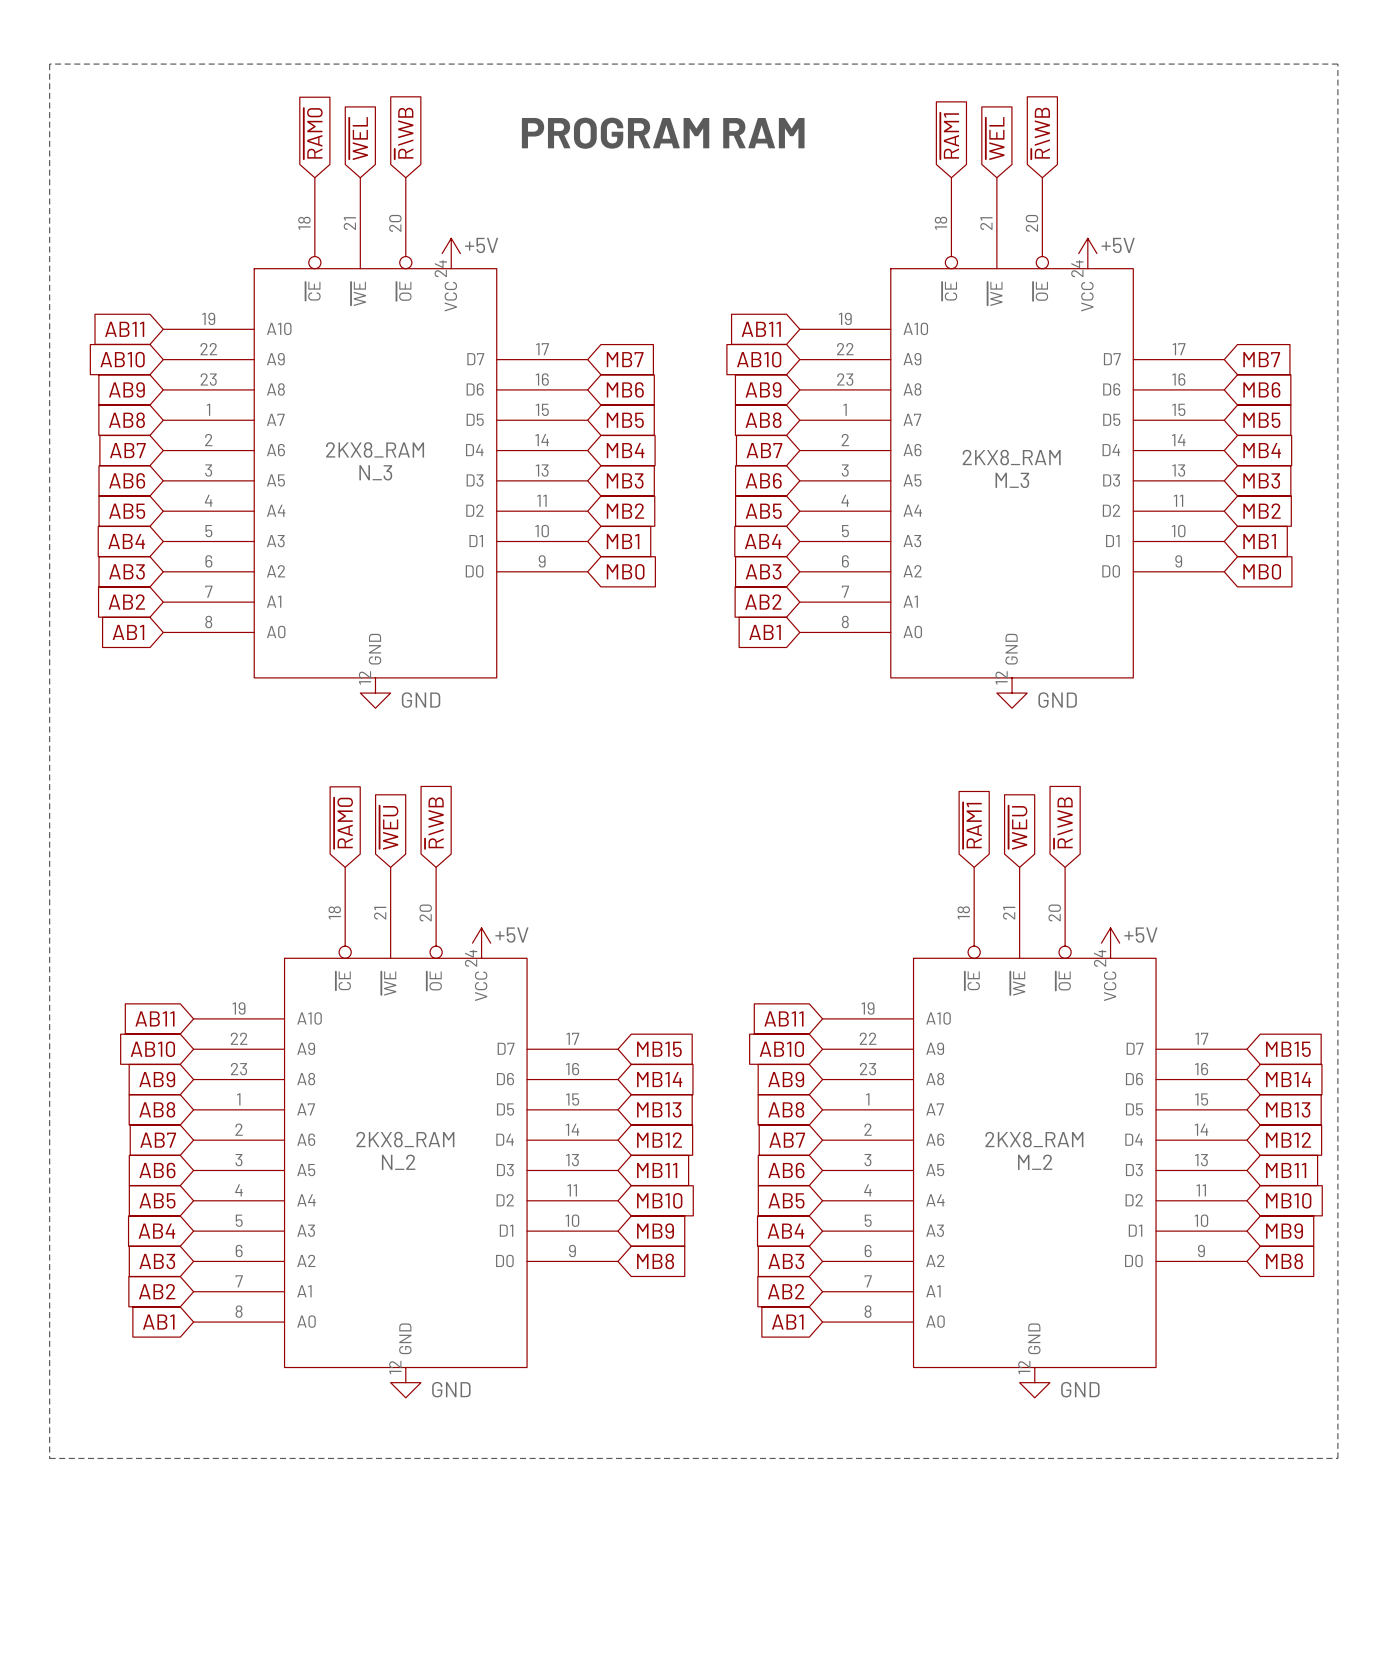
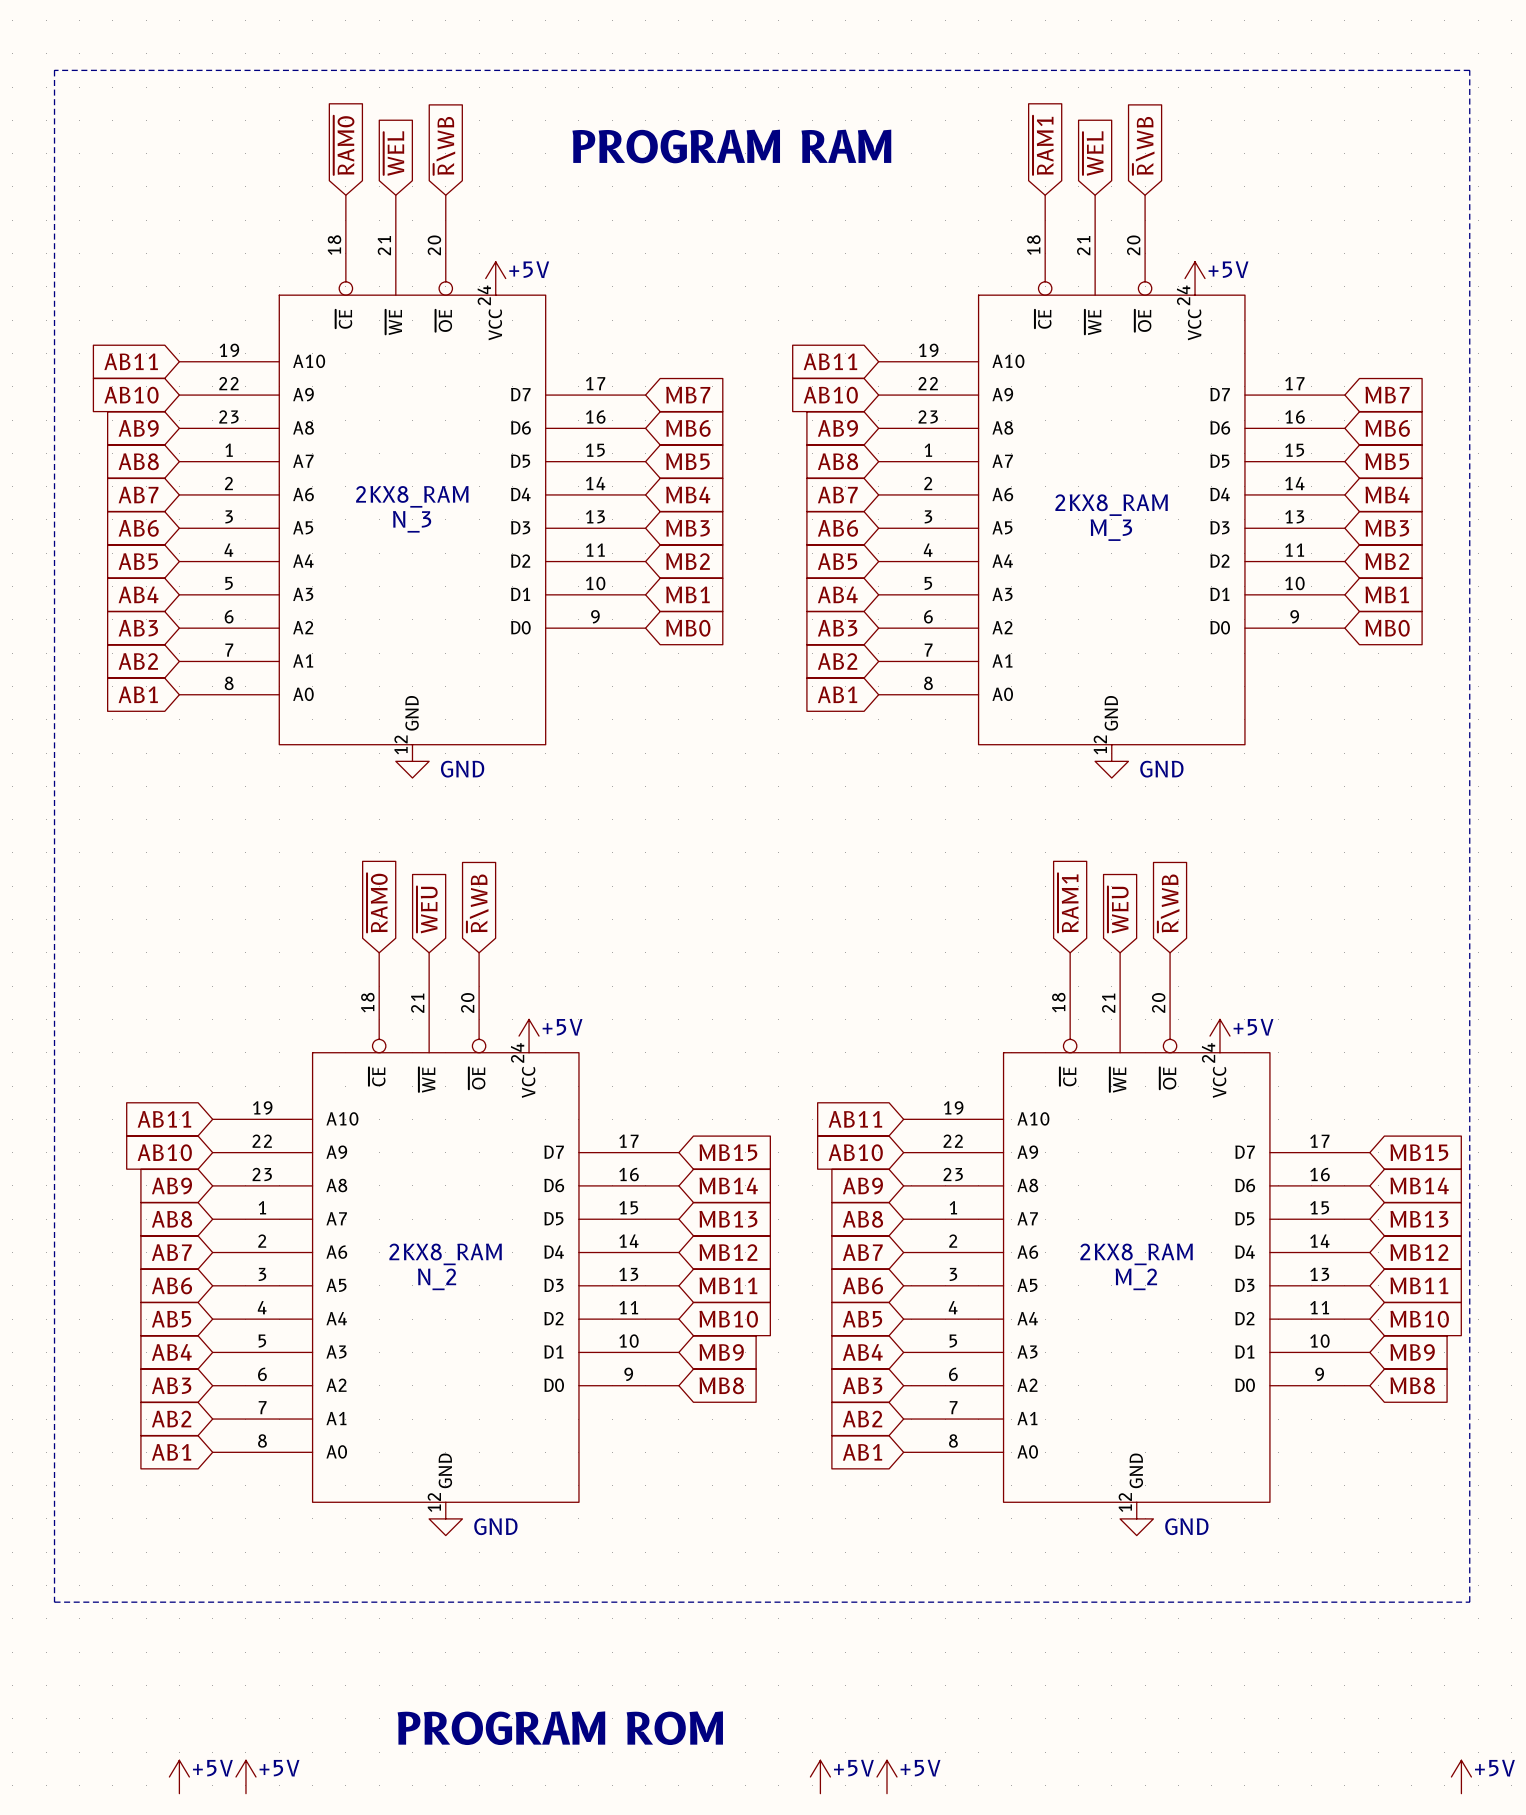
text: none -> PROGRAM ROM (560, 1728)
power symbol: none -> +5V (179, 1776)
power symbol: none -> +5V (245, 1776)
power symbol: none -> +5V (820, 1776)
power symbol: none -> +5V (887, 1776)
power symbol: none -> +5V (1461, 1776)

